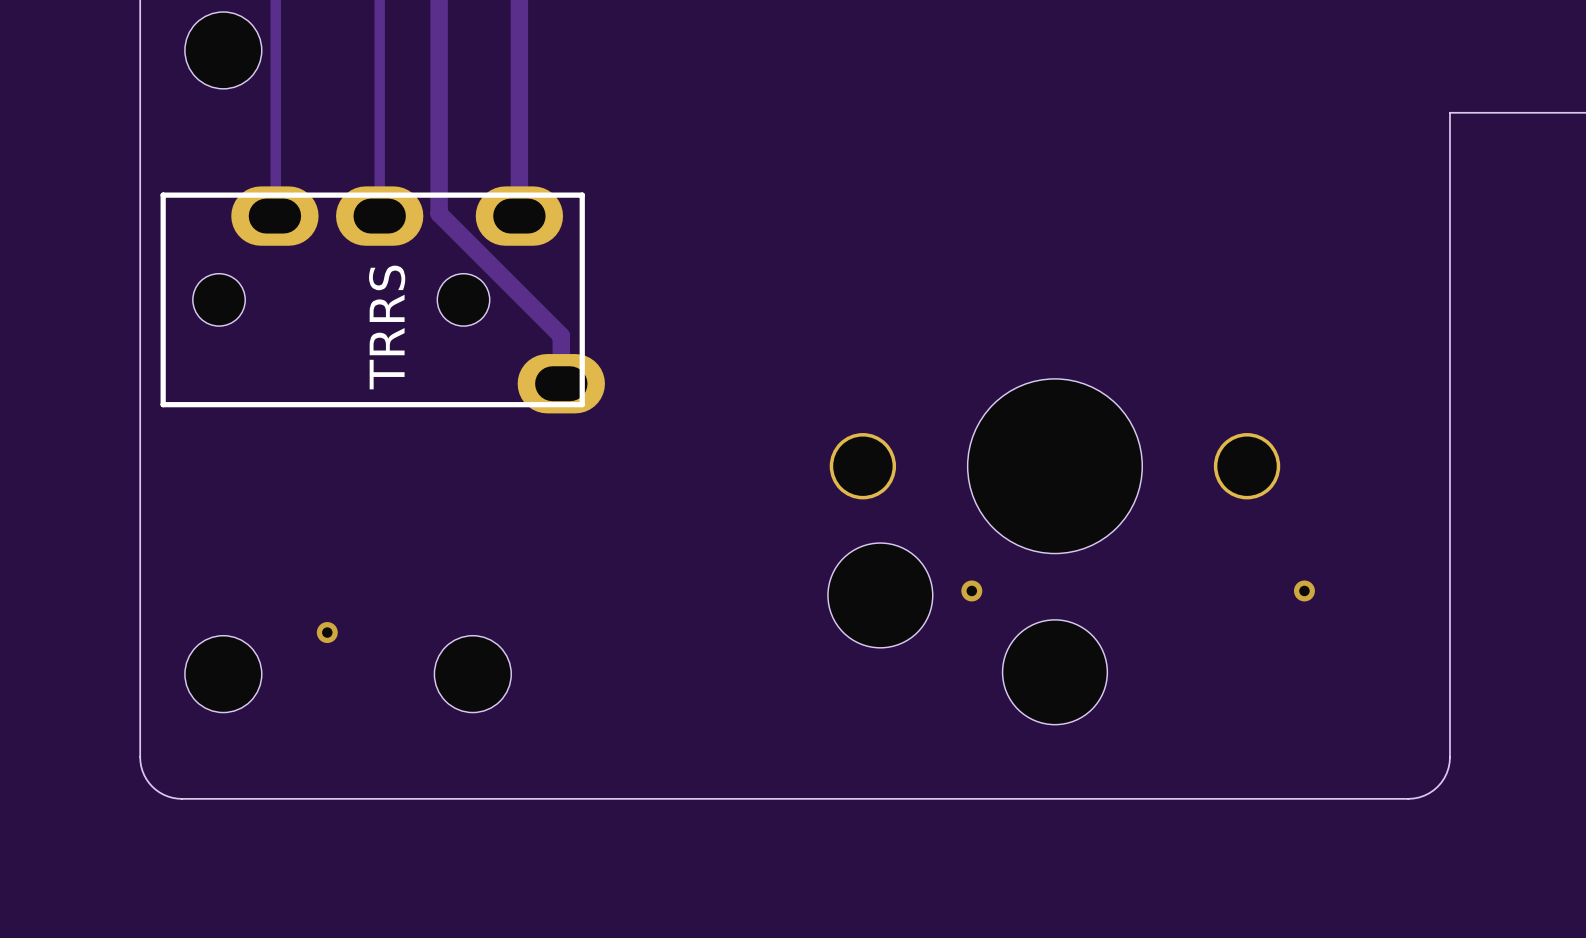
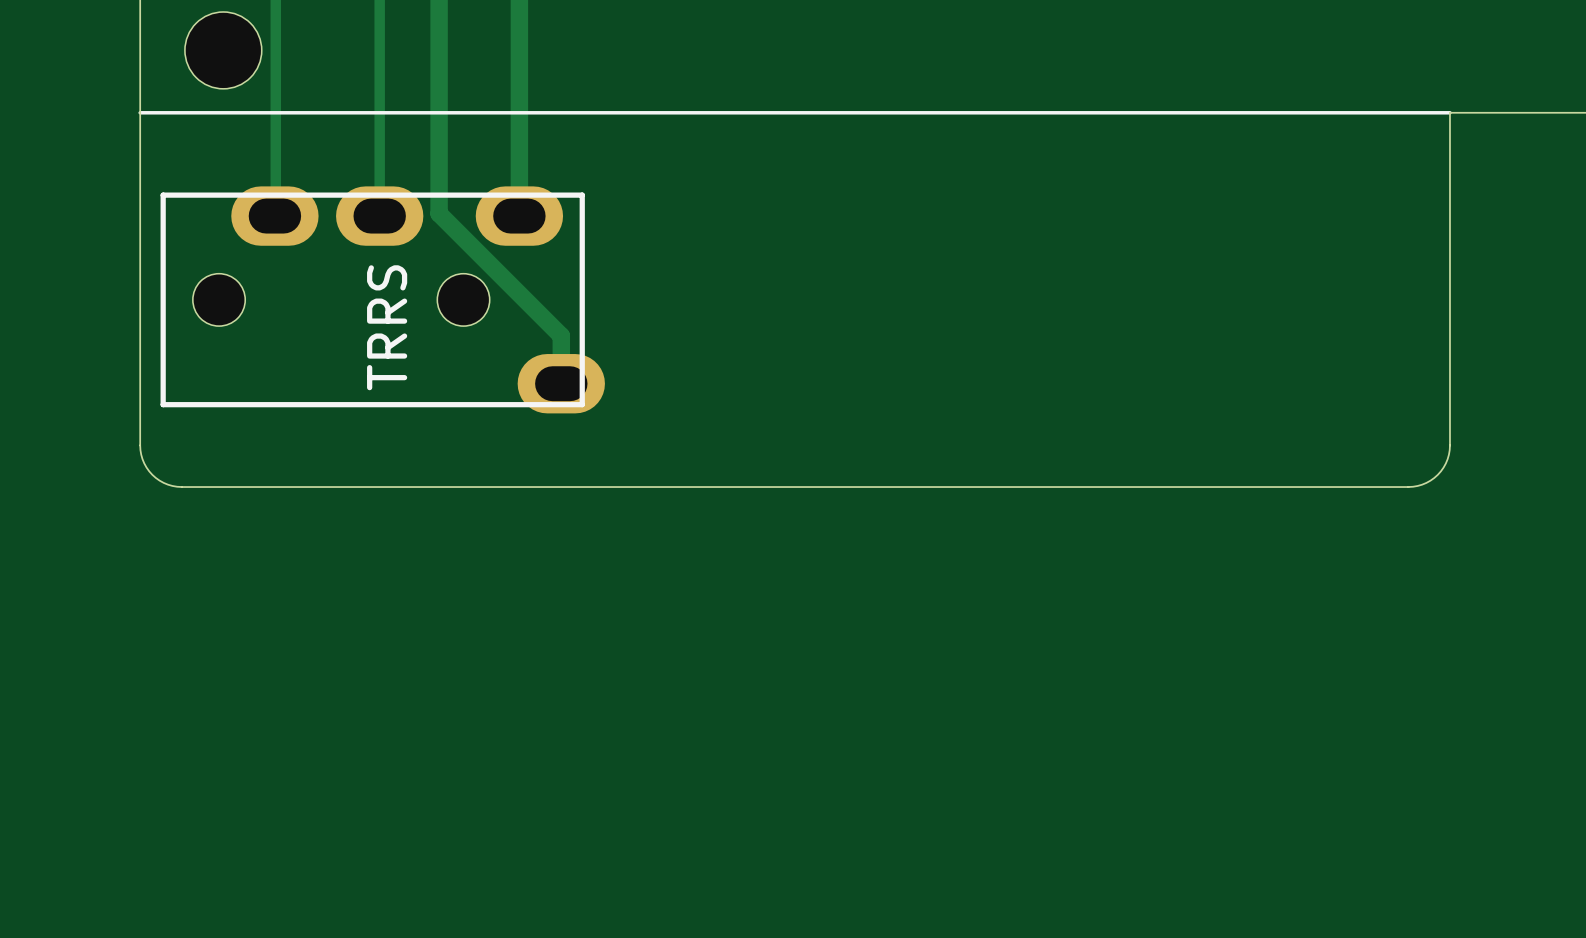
line: none -> (140, 112) (1449, 112)
board edge: (140, 445) (140, 761) (144, 775) (155, 789) (168, 796) (181, 798) (1419, 797) (1437, 786) (1444, 778) (1449, 762) (1449, 445) -> (140, 445) (142, 459) (152, 474) (163, 482) (181, 487) (1408, 487) (1422, 484) (1437, 474) (1447, 459) (1449, 445)
part: (1054, 551) -> none
via: (971, 590) -> none
via: (1304, 590) -> none
via: (327, 632) -> none
part: (223, 674) -> none
part: (472, 674) -> none

